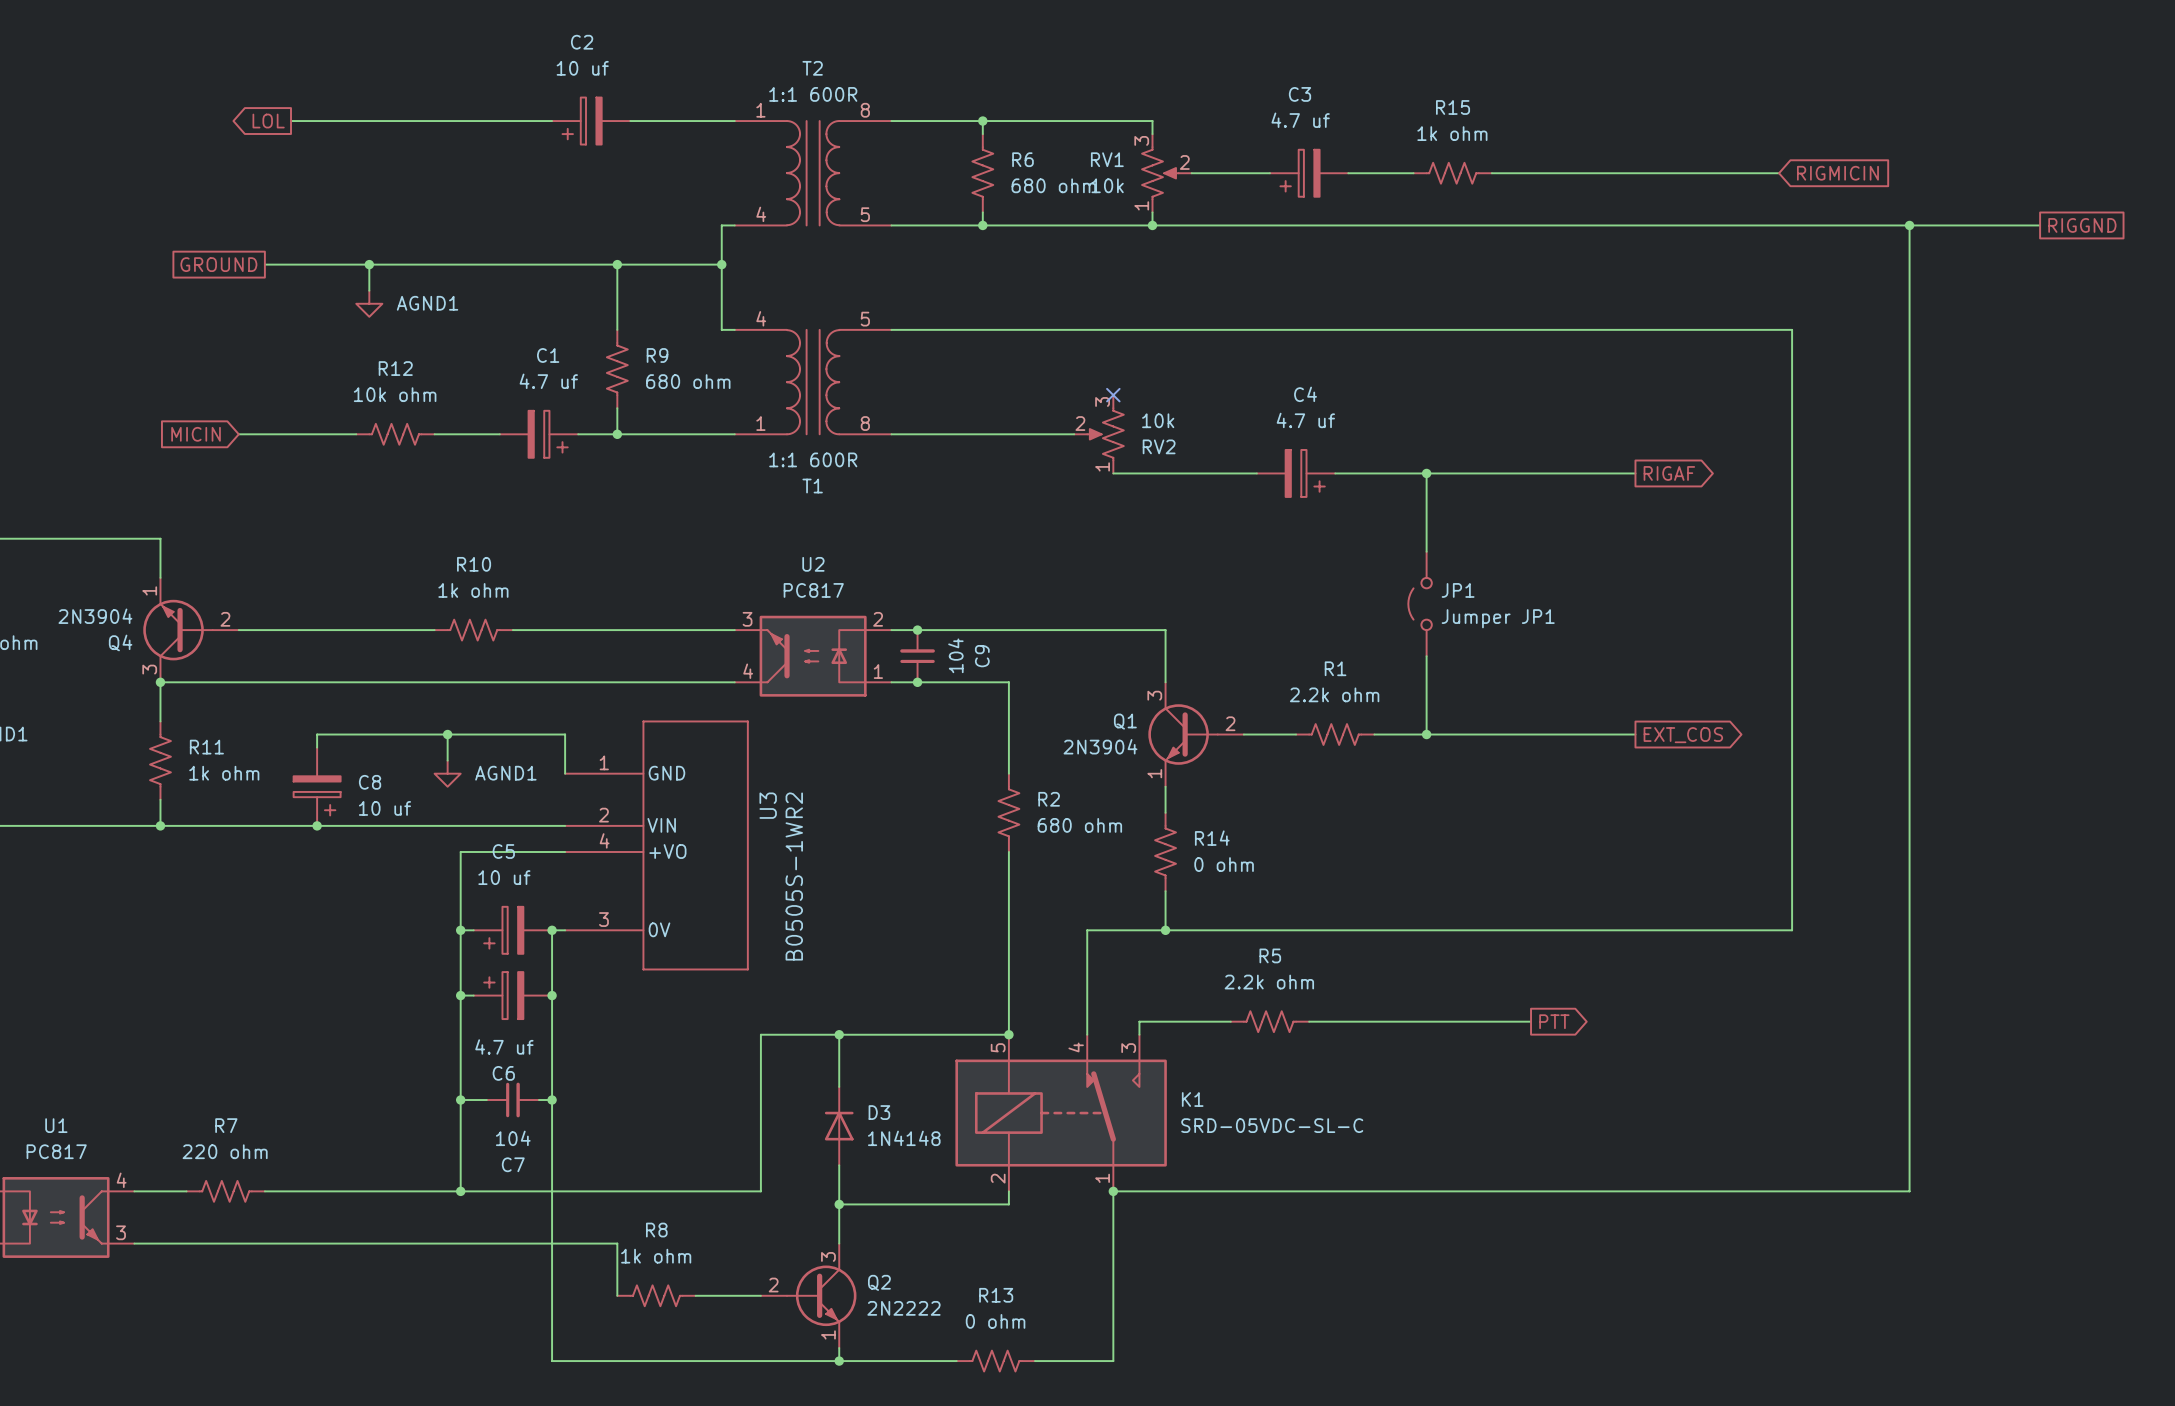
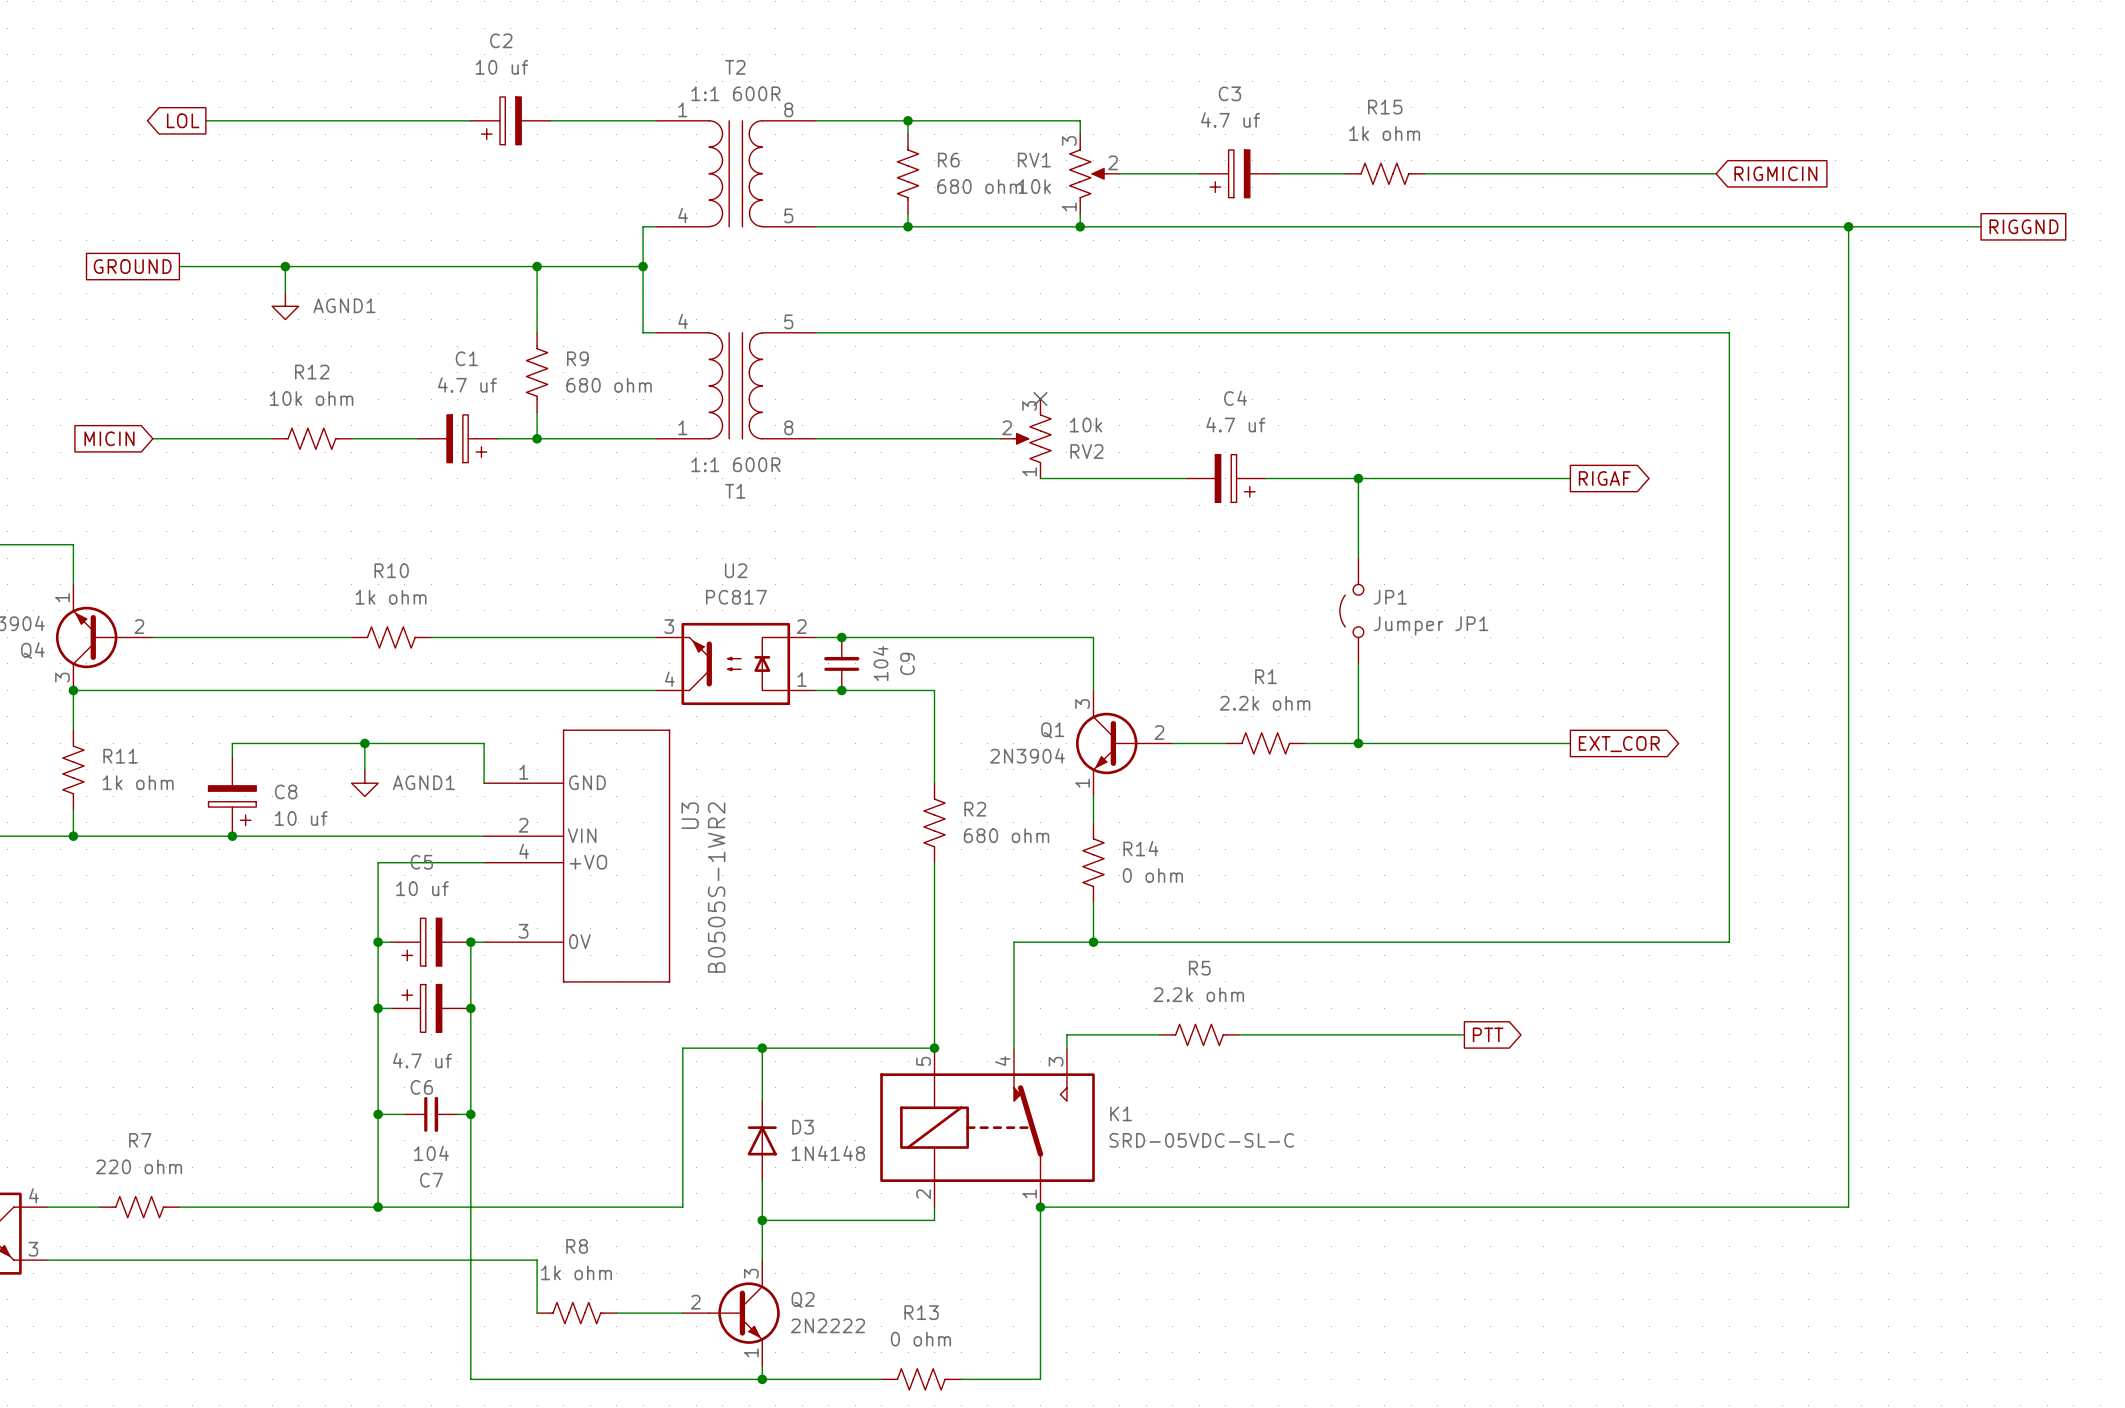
global label: EXT_COS (1683, 735) -> EXT_COR (1619, 744)

